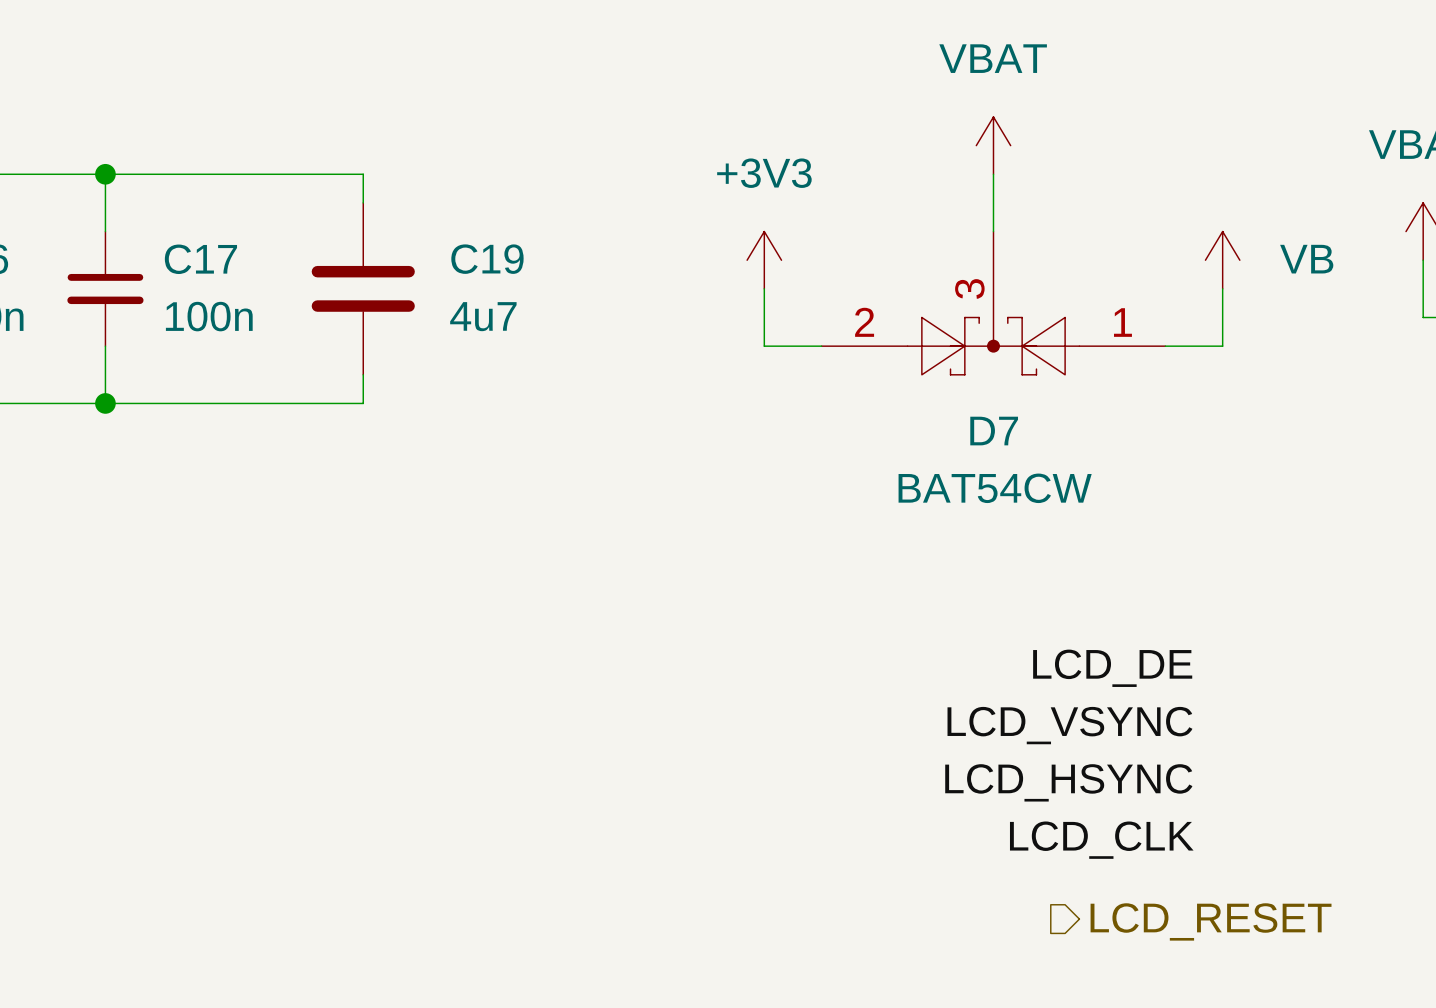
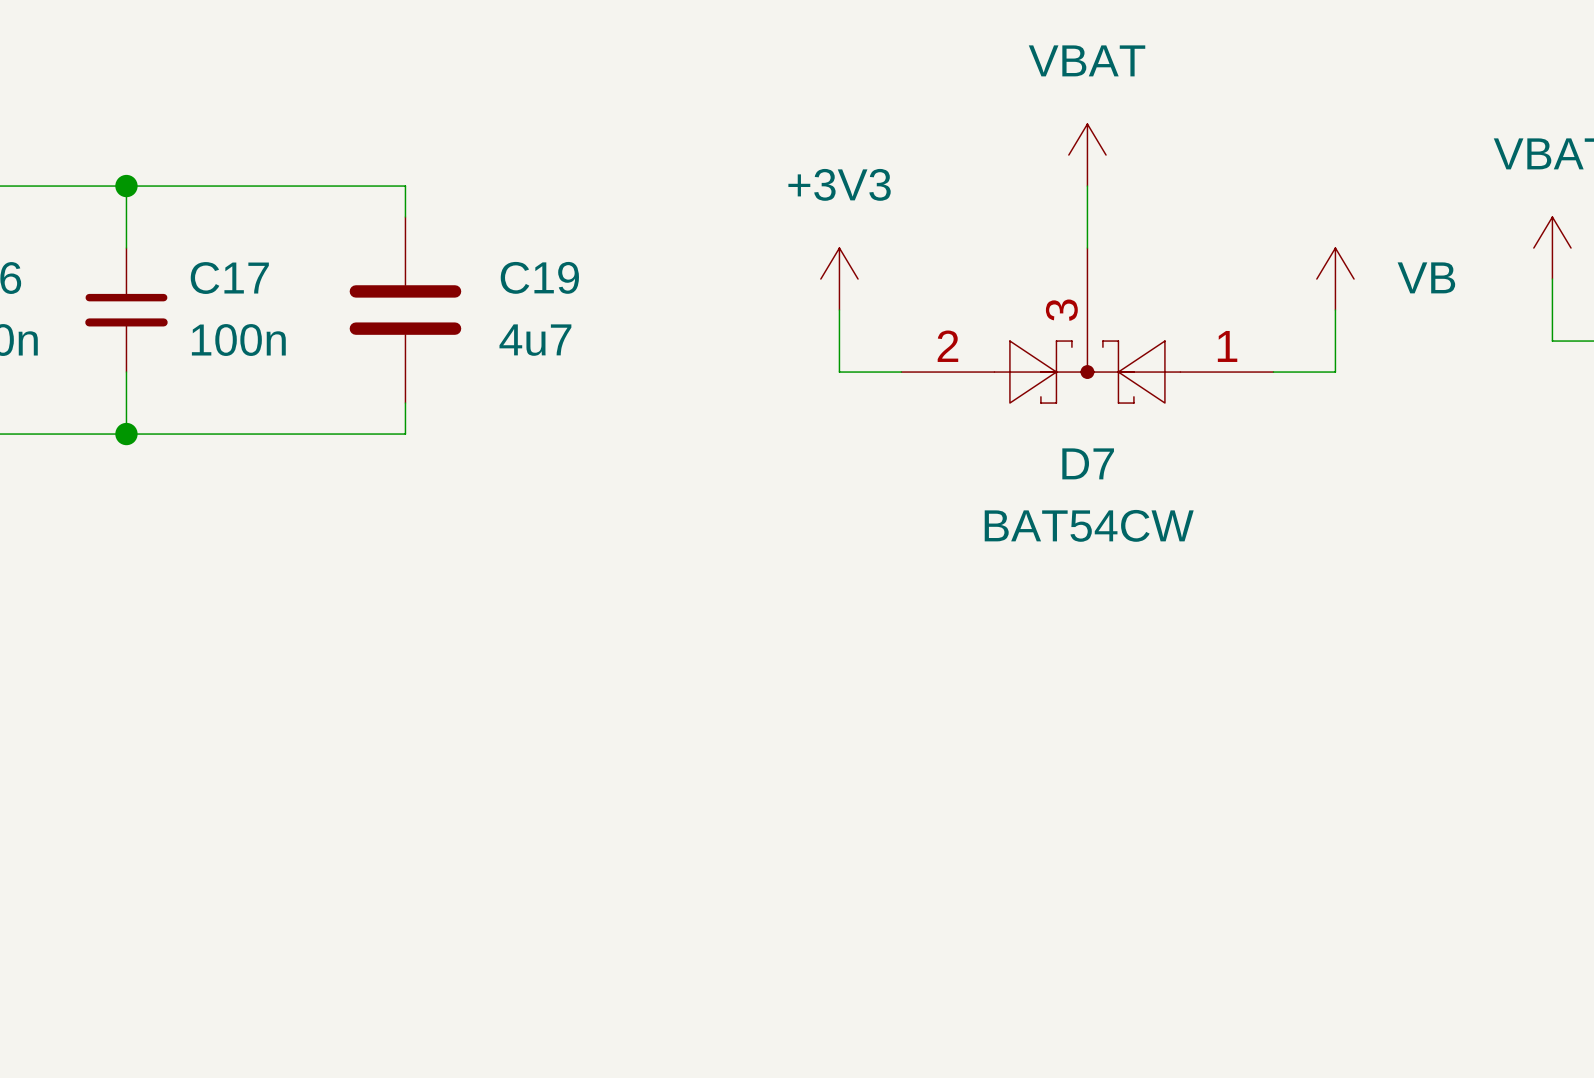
label: LCD_DE (1112, 668) -> none
label: LCD_VSYNC (1069, 725) -> none
label: LCD_HSYNC (1068, 782) -> none
label: LCD_CLK (1101, 840) -> none
hierarchical label: LCD_RESET (1211, 921) -> none

